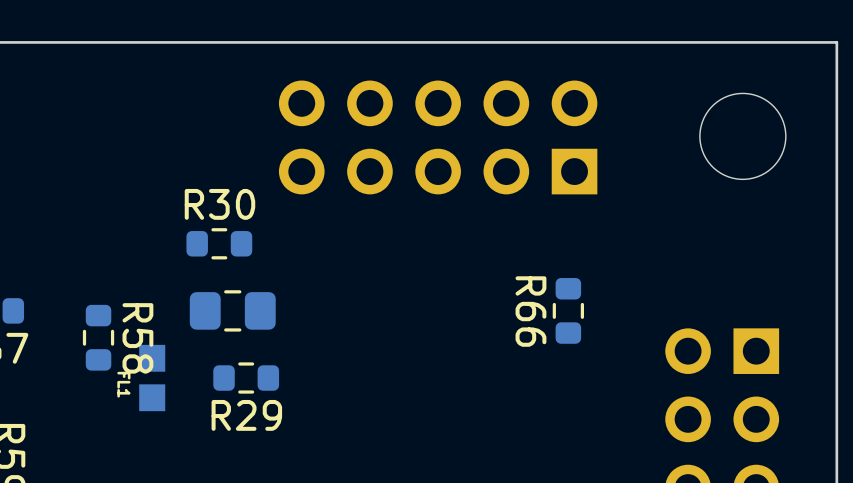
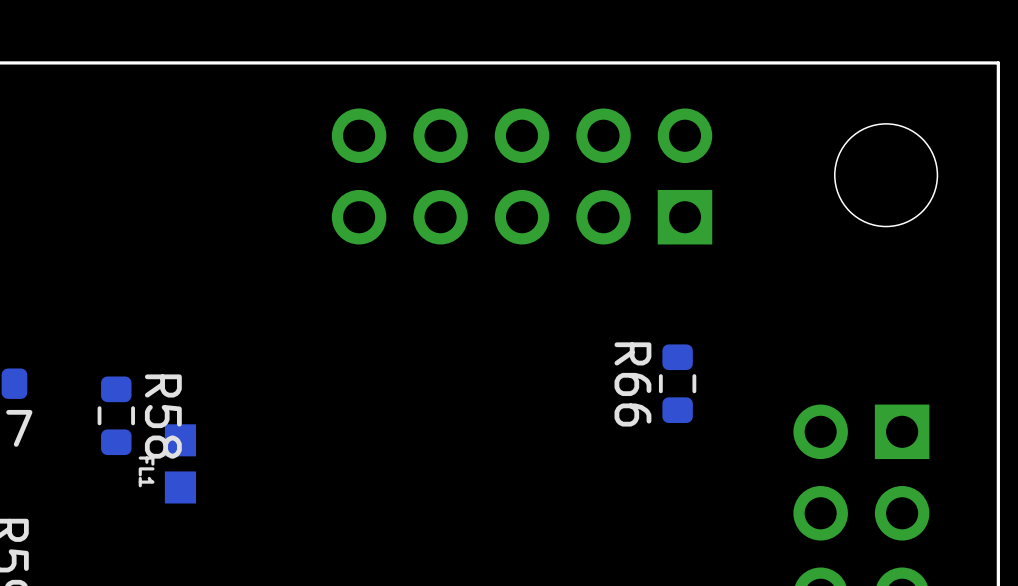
R30: (219, 243) -> none
part: (232, 310) -> none
R29: (246, 378) -> none

